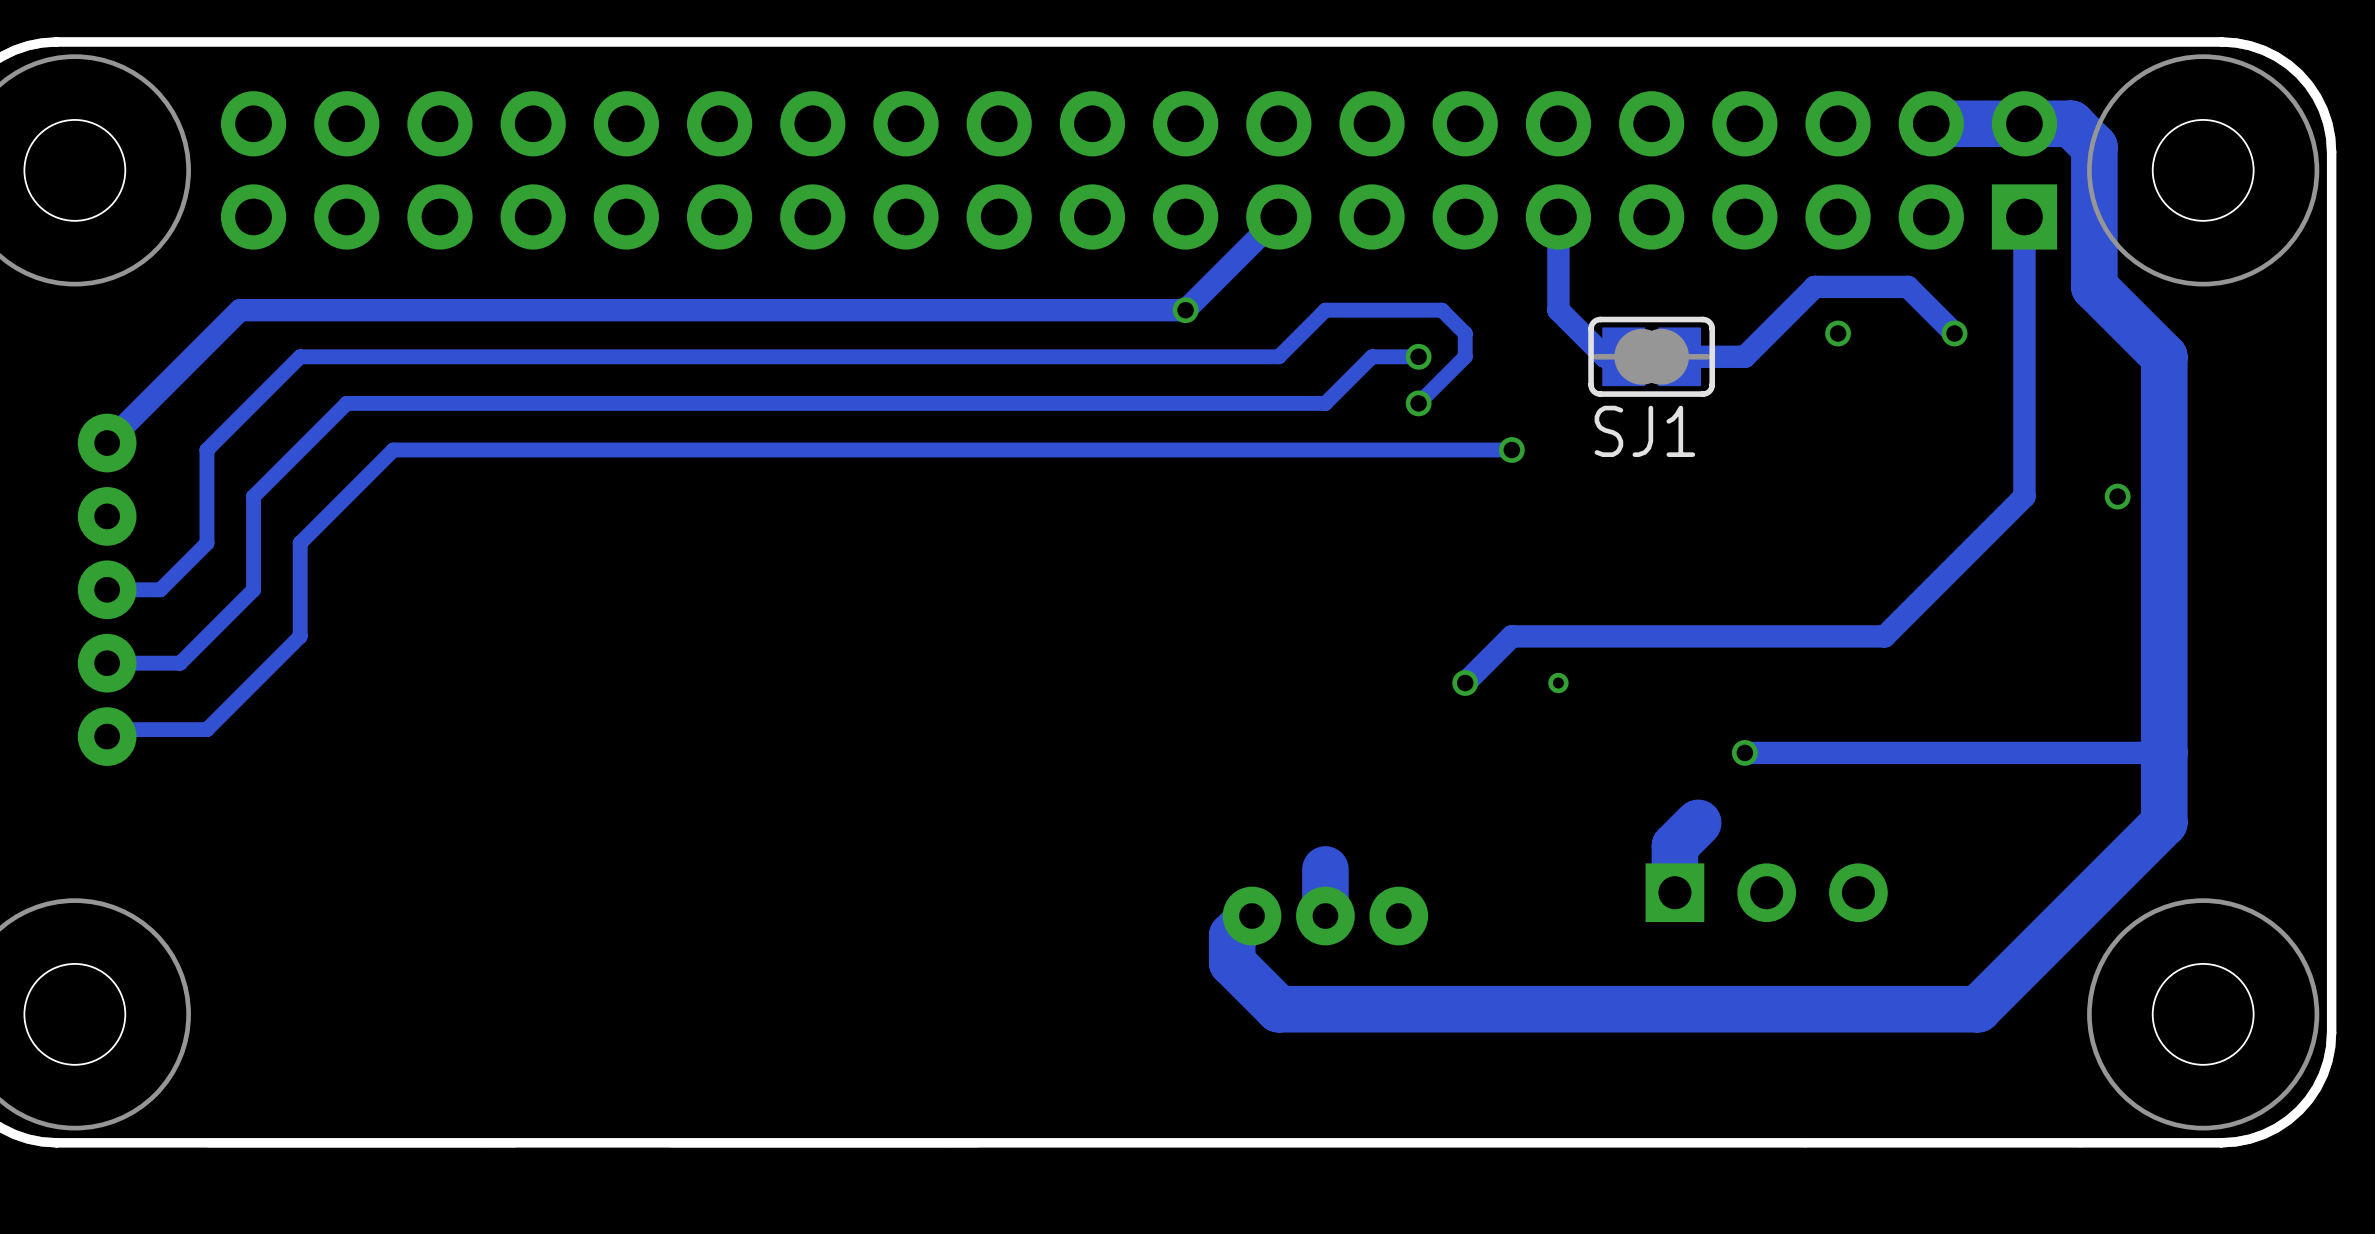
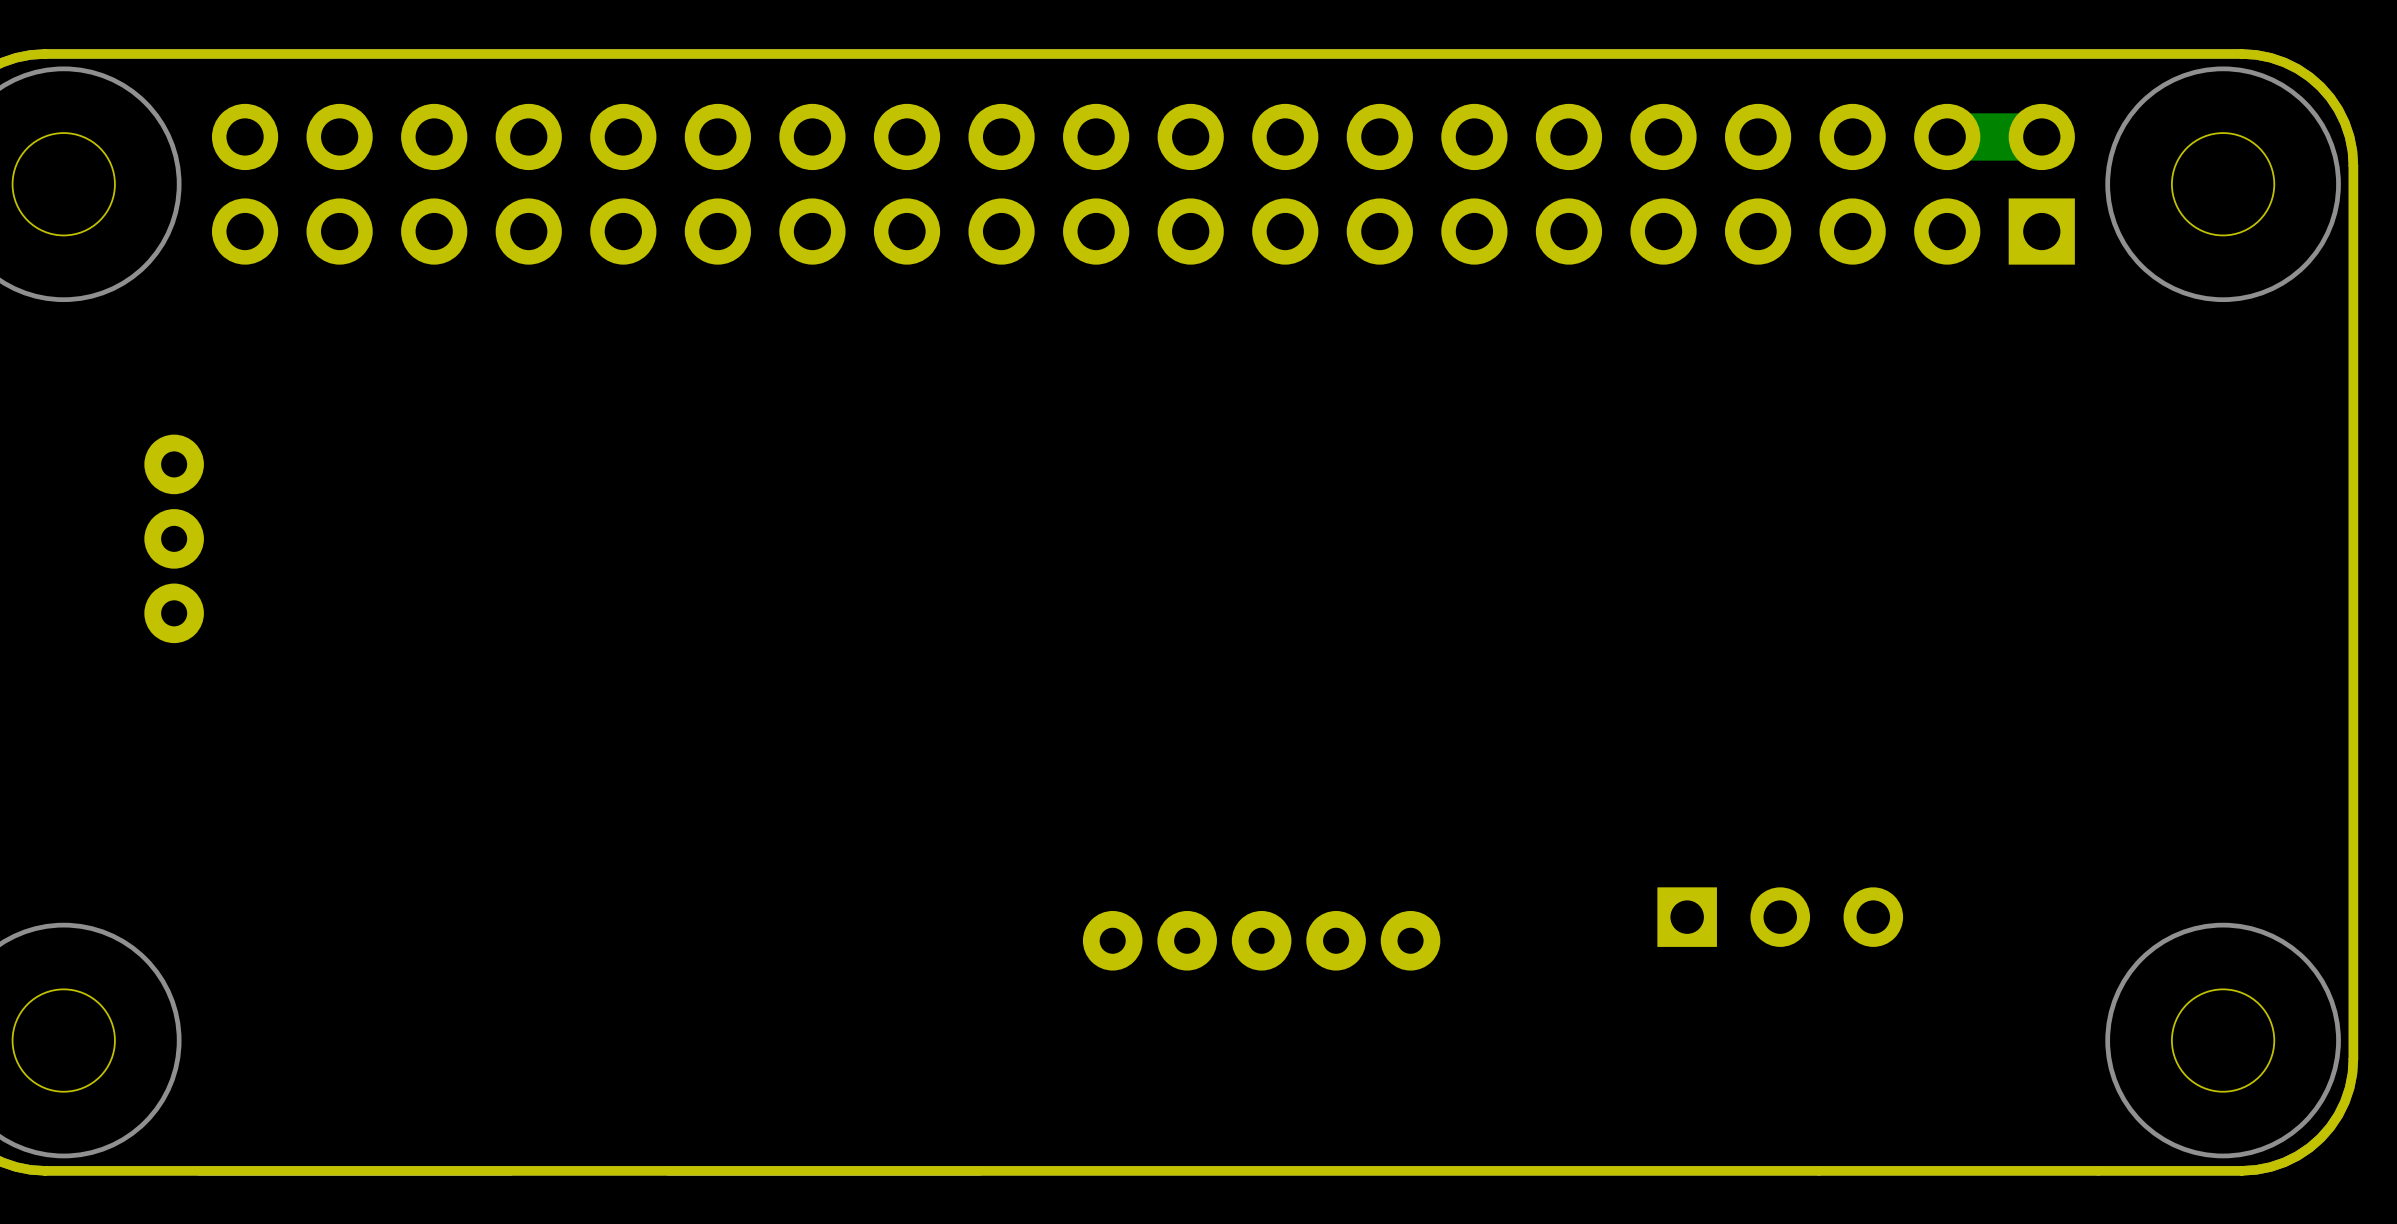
track: (2024, 123) (2071, 123) (2094, 147) (2094, 286) (2164, 356) (2164, 822) (1977, 1009) (1278, 1009) (1232, 962) (1232, 935) (1252, 916) -> none
track: (1278, 216) (1185, 310) (239, 310) (107, 443) -> none
track: (1558, 216) (1558, 310) (1605, 356) (1623, 356) -> none
track: (2024, 216) (2024, 496) (1884, 636) (1511, 636) (1465, 683) -> none
via: (1185, 310) -> none
via: (1838, 333) -> none
track: (1954, 333) (1907, 286) (1814, 286) (1744, 356) (1679, 356) -> none
via: (1954, 333) -> none
track: (1418, 356) (1372, 356) (1325, 403) (346, 403) (253, 496) (253, 589) (180, 663) (107, 663) -> none
via: (1418, 356) -> none
SJ1: (1651, 356) -> none
track: (1418, 403) (1465, 356) (1465, 333) (1441, 310) (1325, 310) (1278, 356) (300, 356) (206, 450) (206, 543) (160, 589) (107, 589) -> none
via: (1418, 403) -> none
track: (1511, 450) (393, 450) (300, 543) (300, 636) (206, 729) (114, 729) (107, 736) -> none
via: (1511, 450) -> none
via: (2117, 496) -> none
part: none -> (174, 538)
part: (107, 589) -> none
via: (1465, 683) -> none
via: (1558, 683) -> none
via: (1744, 752) -> none
track: (2164, 752) (1744, 752) -> none
track: (1698, 822) (1674, 846) (1674, 892) -> none
track: (1325, 869) (1325, 916) -> none
part: none -> (1261, 940)
part: (1325, 916) -> none

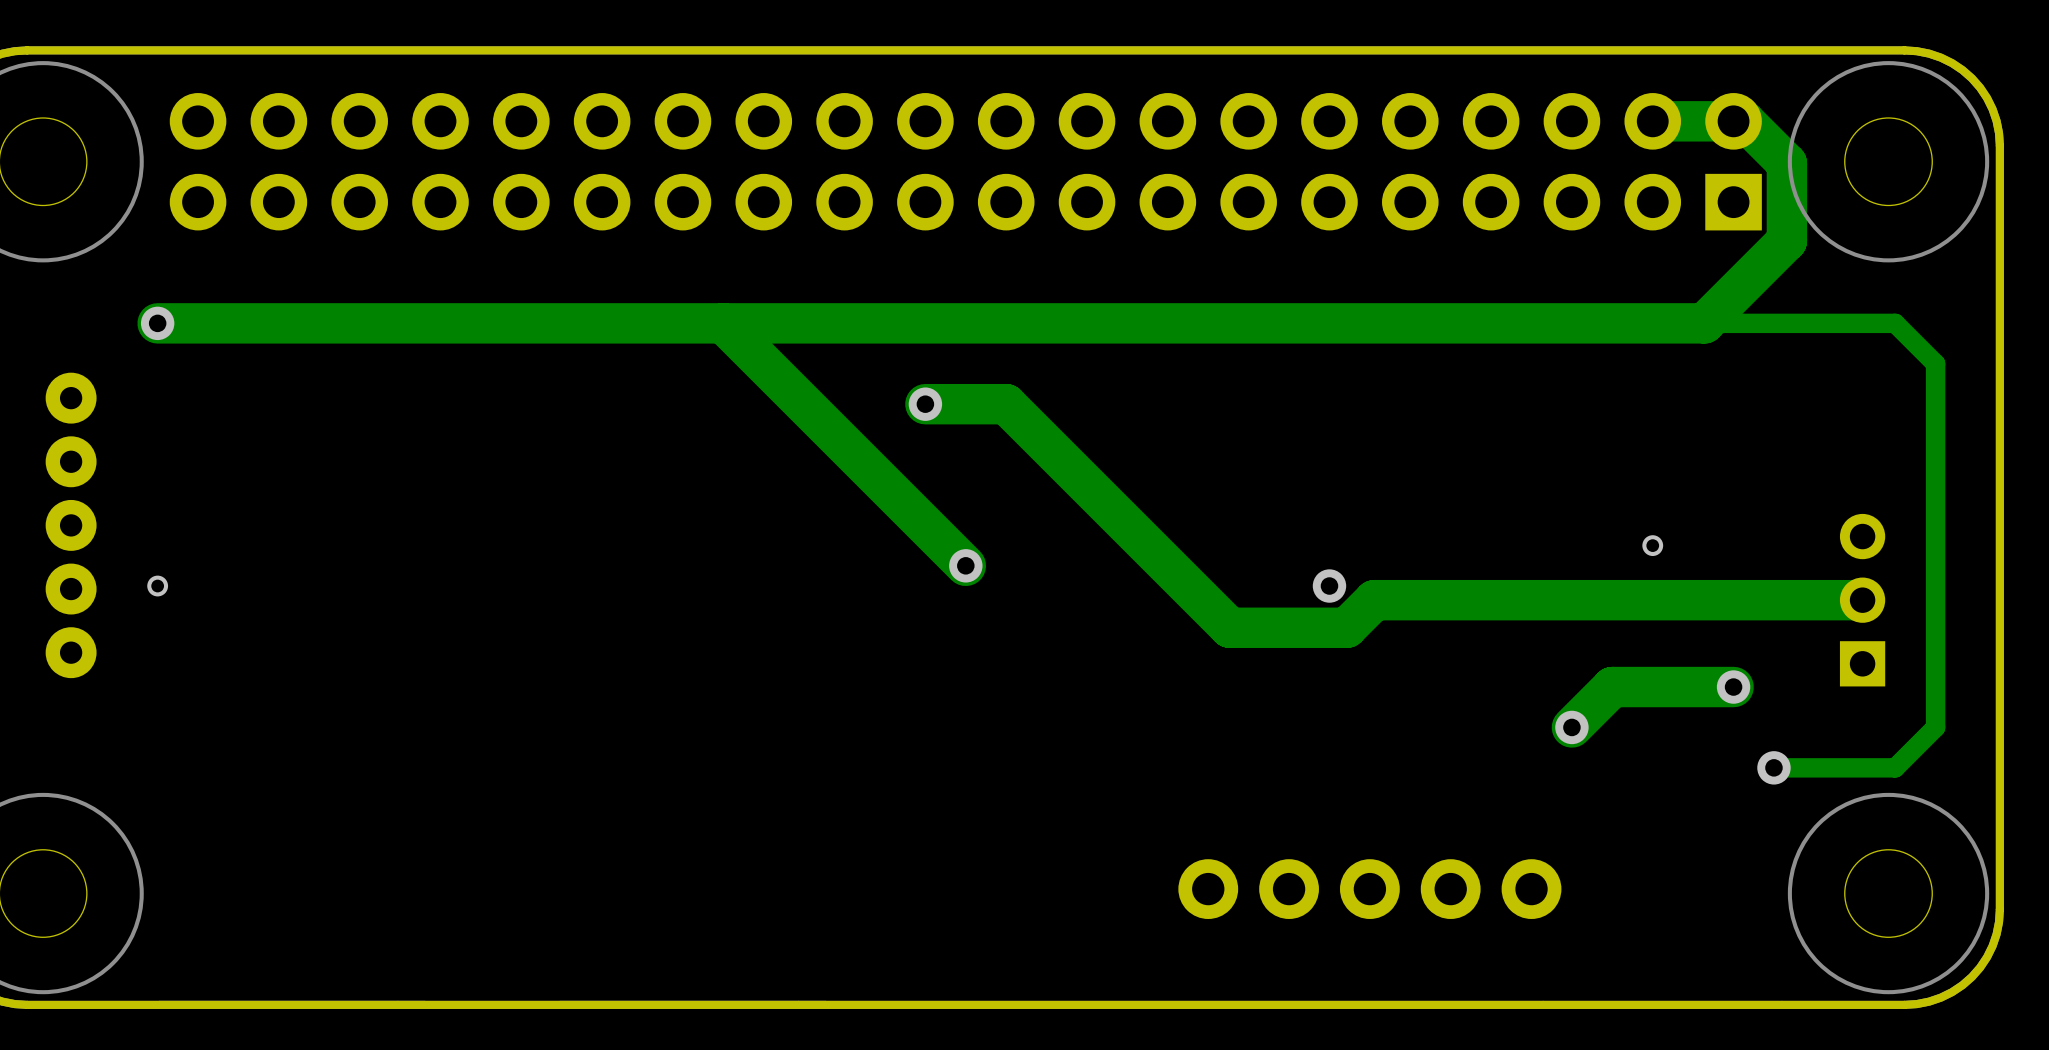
track: none -> (1733, 121) (1744, 121) (1786, 163) (1786, 240) (1704, 323)
via: none -> (157, 323)
track: none -> (723, 323) (965, 565)
track: none -> (1704, 323) (157, 323)
track: none -> (1704, 323) (1895, 323) (1935, 363) (1935, 727) (1895, 767) (1773, 767)
track: none -> (925, 404) (1006, 404) (1229, 627) (1346, 627) (1374, 600) (1862, 600)
via: none -> (925, 404)
part: (174, 538) -> none
part: none -> (71, 525)
via: none -> (1652, 545)
via: none -> (965, 565)
via: none -> (157, 586)
via: none -> (1329, 586)
part: none -> (1862, 600)
track: none -> (1733, 687) (1612, 687) (1571, 727)
via: none -> (1733, 687)
via: none -> (1571, 727)
via: none -> (1773, 767)
part: (1780, 917) -> none
part: (1261, 940) -> none
part: none -> (1369, 889)

